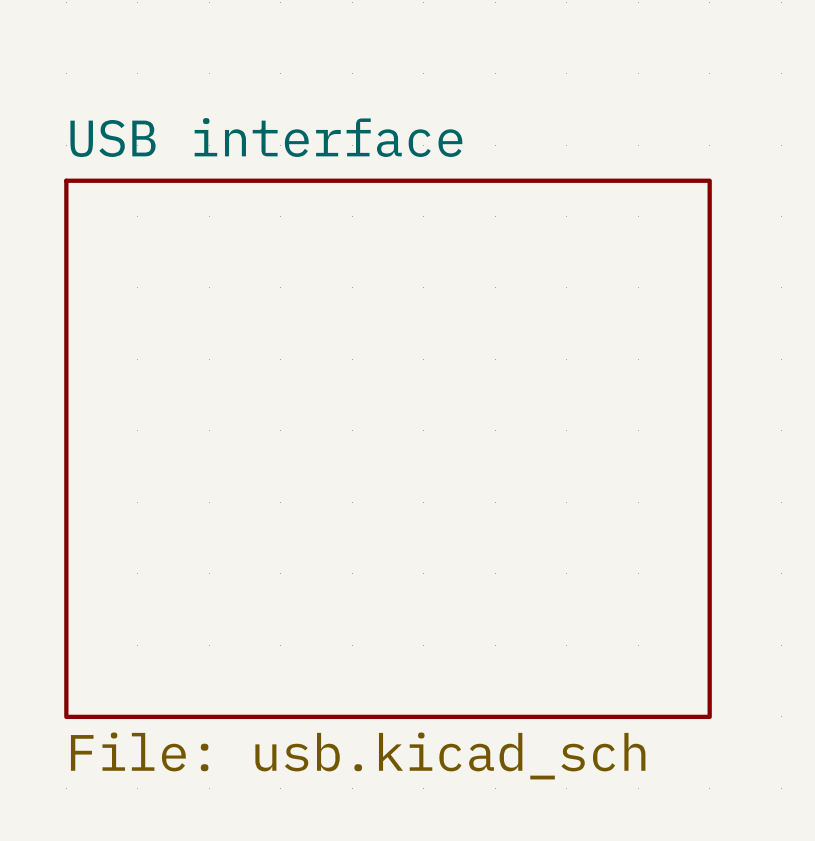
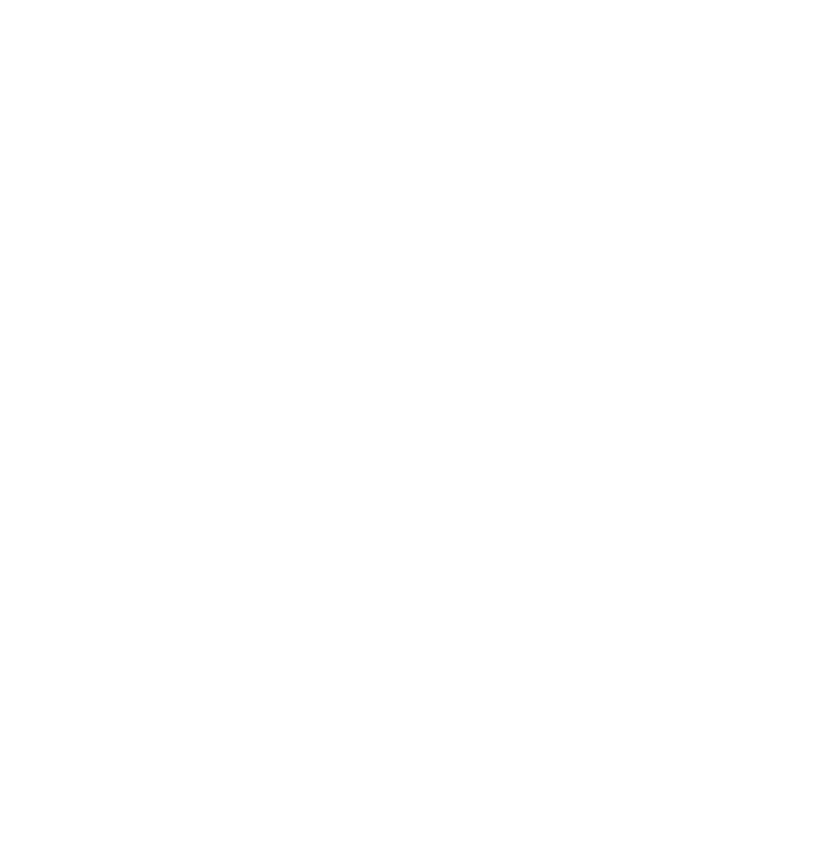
sheet USB interface: File: usb.kicad_sch (388, 448) -> none

